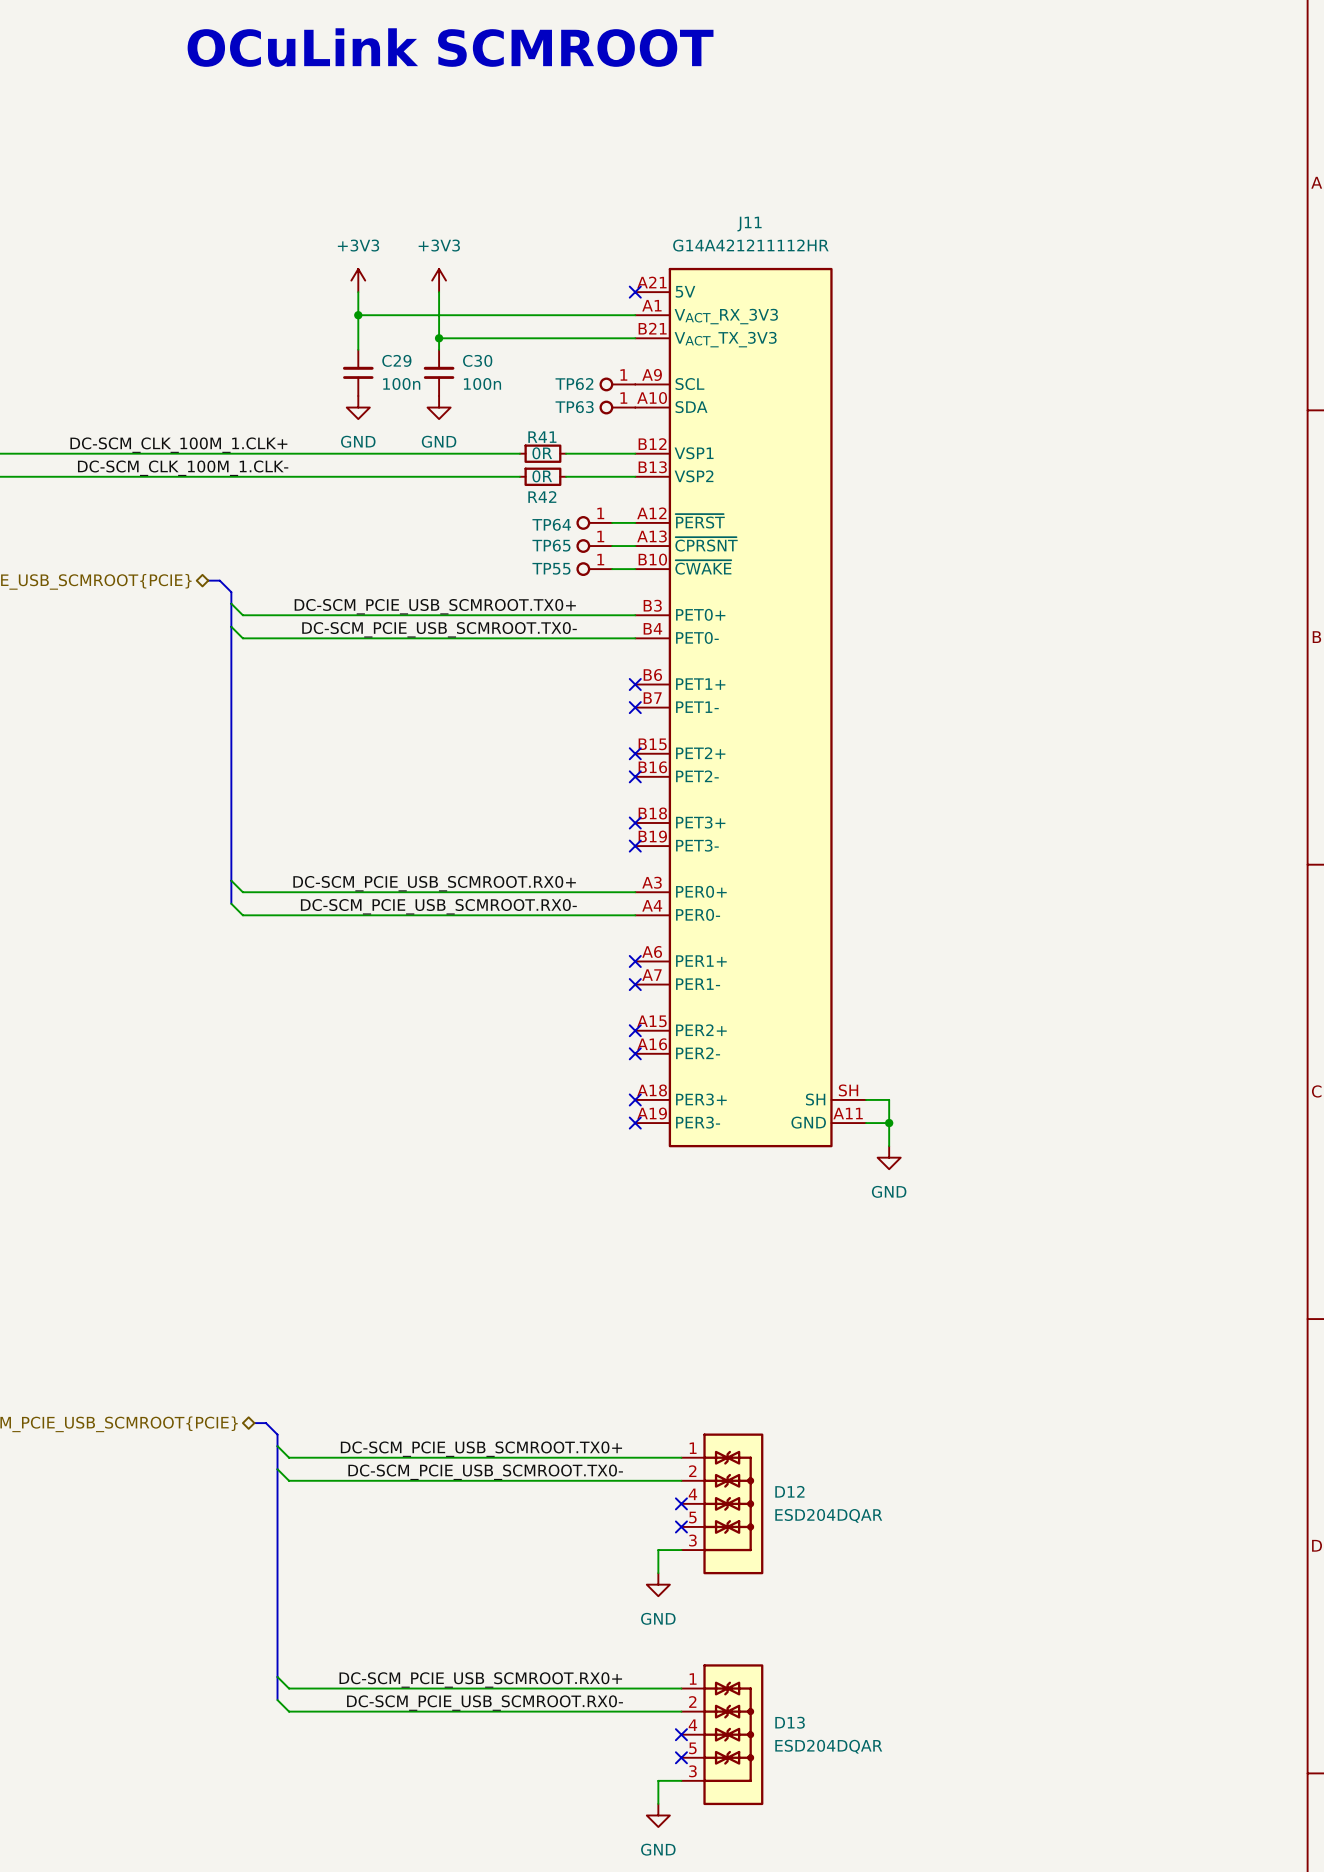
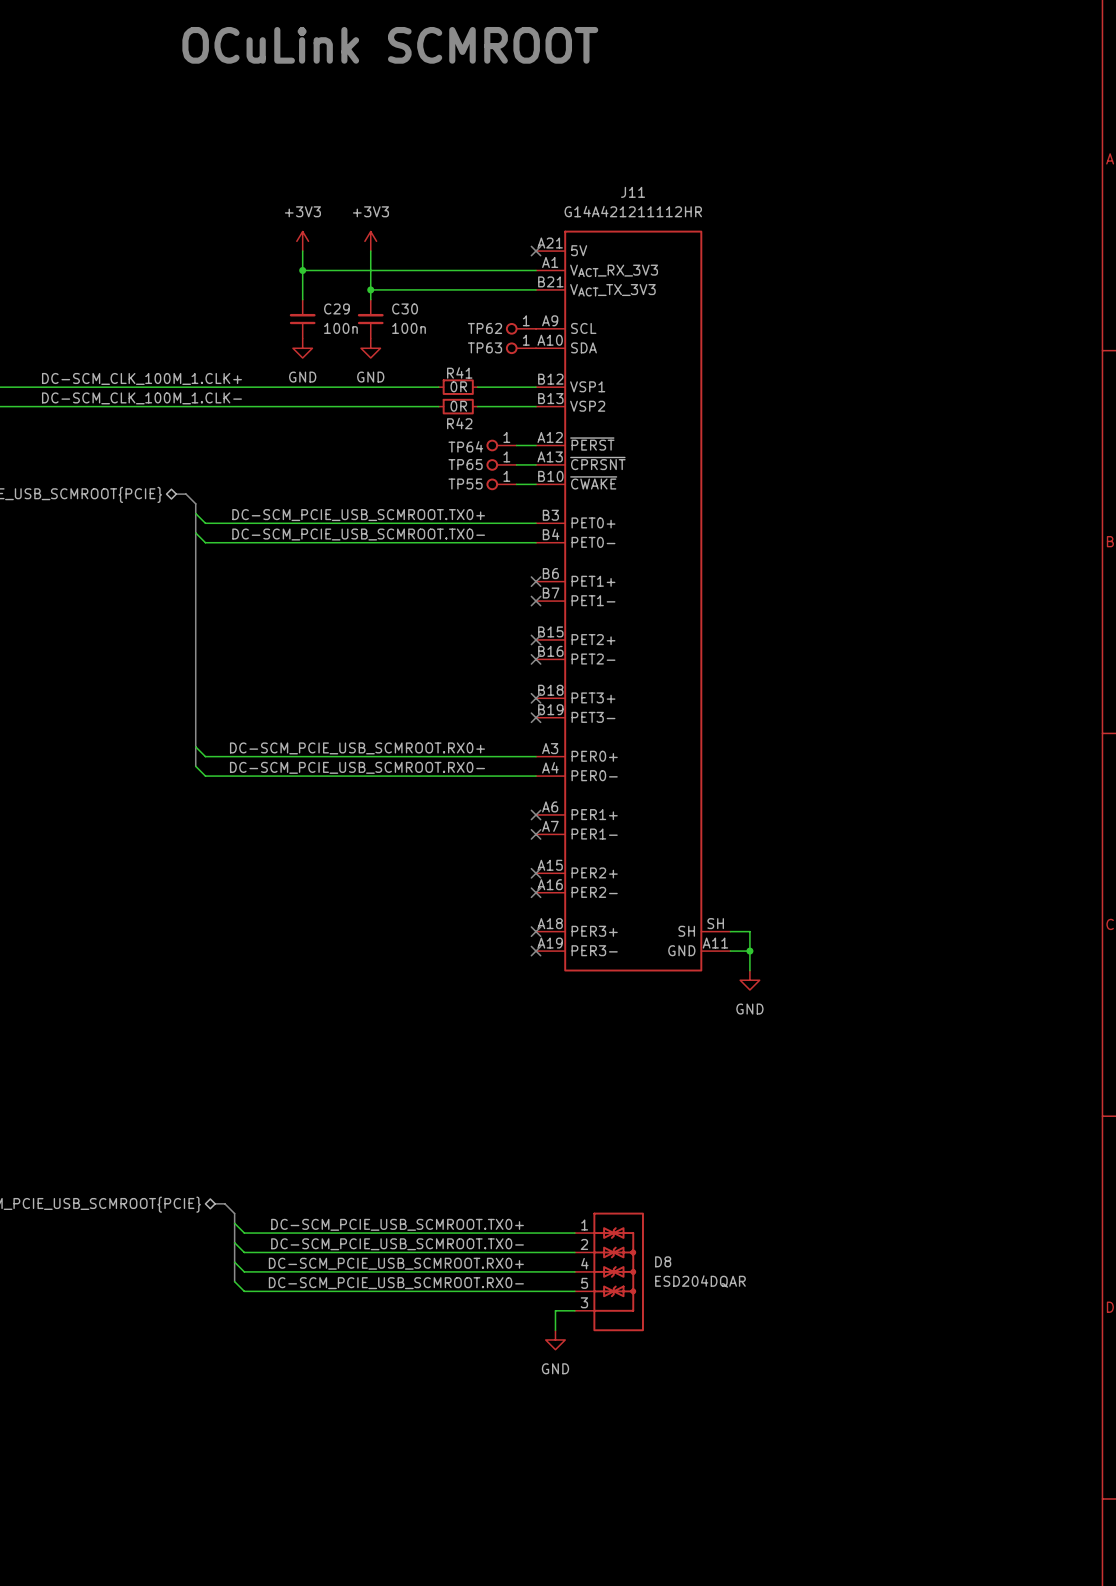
D12 name: D12 (789, 1491) -> D8 (663, 1261)
no-connect mark: (681, 1503) -> none
bus: (277, 1515) (277, 1700) -> none
no-connect mark: (681, 1526) -> none
wire: (277, 1676) (289, 1688) (681, 1688) -> (234, 1262) (244, 1271) (574, 1271)
label position: DC-SCM_PCIE_USB_SCMROOT.RX0+ (480, 1679) -> DC-SCM_PCIE_USB_SCMROOT.RX0+ (396, 1263)
wire: (277, 1700) (289, 1711) (681, 1711) -> (234, 1281) (244, 1291) (574, 1291)
label position: DC-SCM_PCIE_USB_SCMROOT.RX0- (485, 1703) -> DC-SCM_PCIE_USB_SCMROOT.RX0- (396, 1283)
no-connect mark: (681, 1734) -> none
D13: (722, 1734) -> none
no-connect mark: (681, 1757) -> none
wire: (681, 1780) (658, 1780) (658, 1803) -> none
power symbol: GND (658, 1815) -> none

